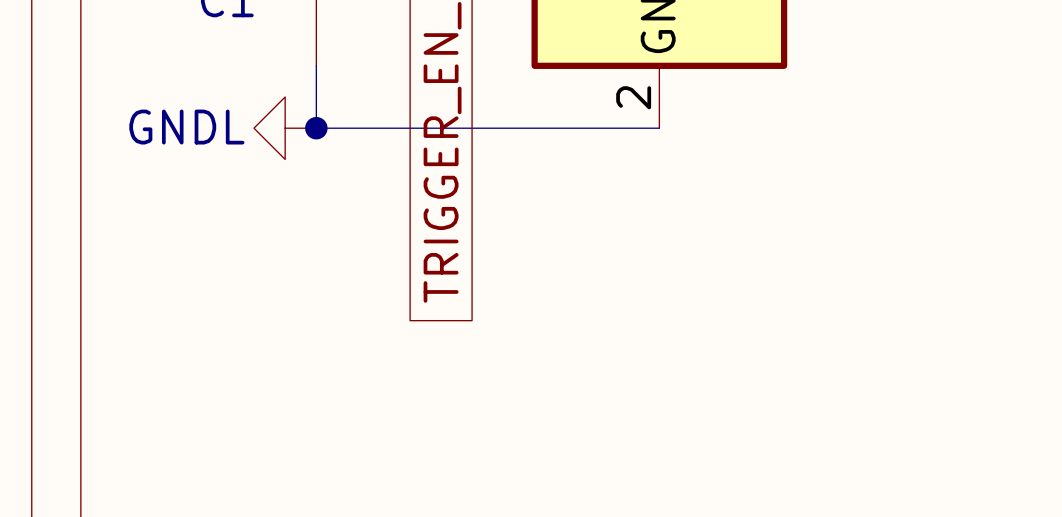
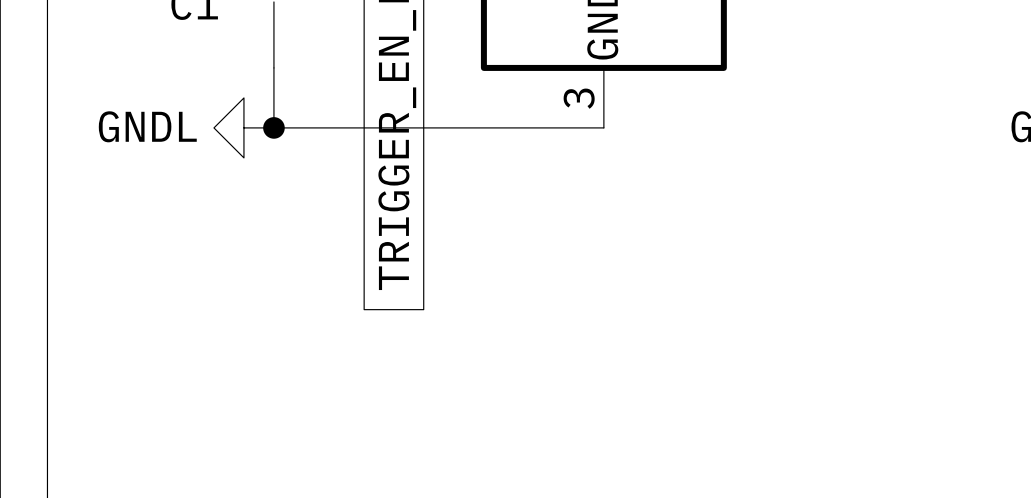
part pin number: 2 (633, 97) -> 3 (579, 98)

